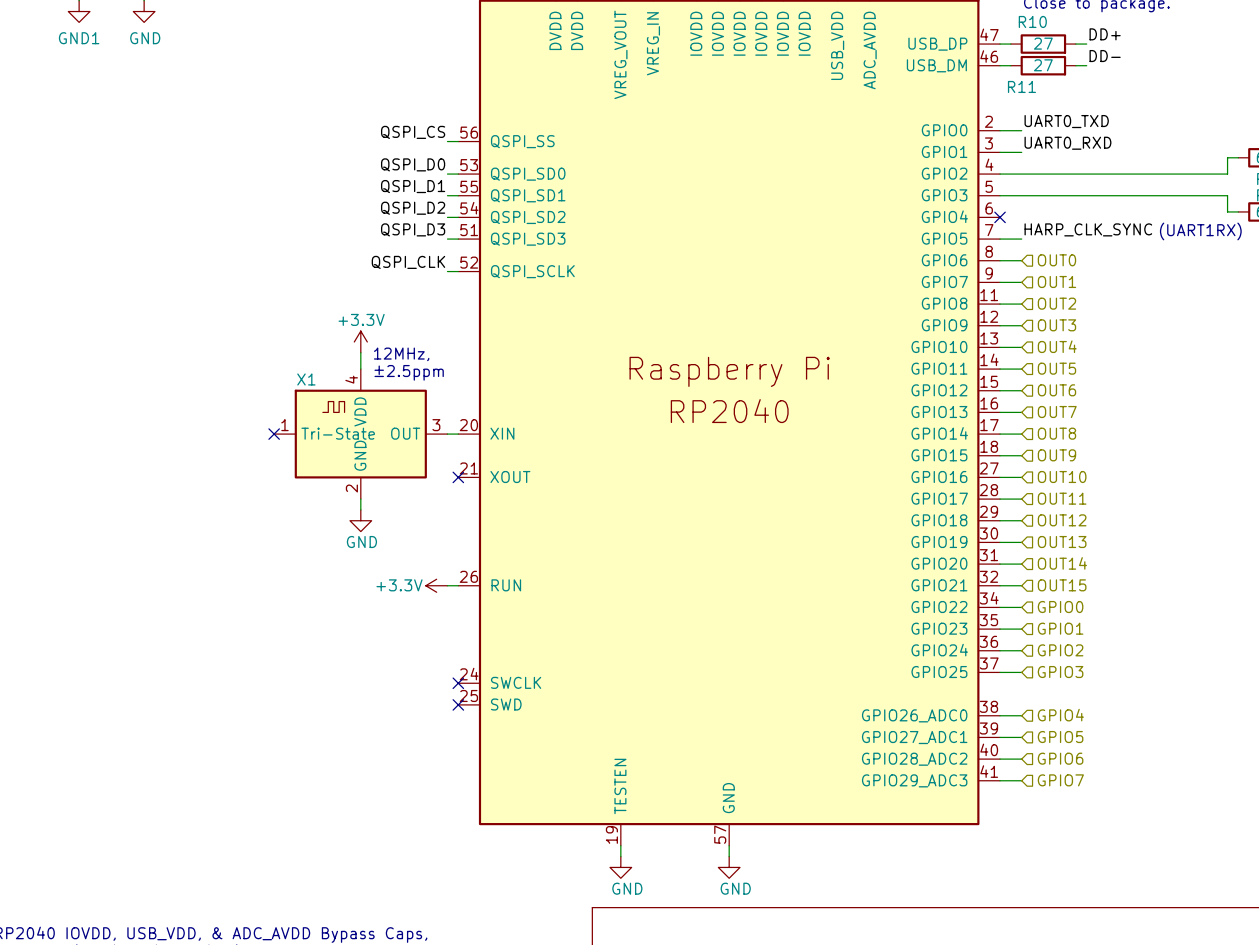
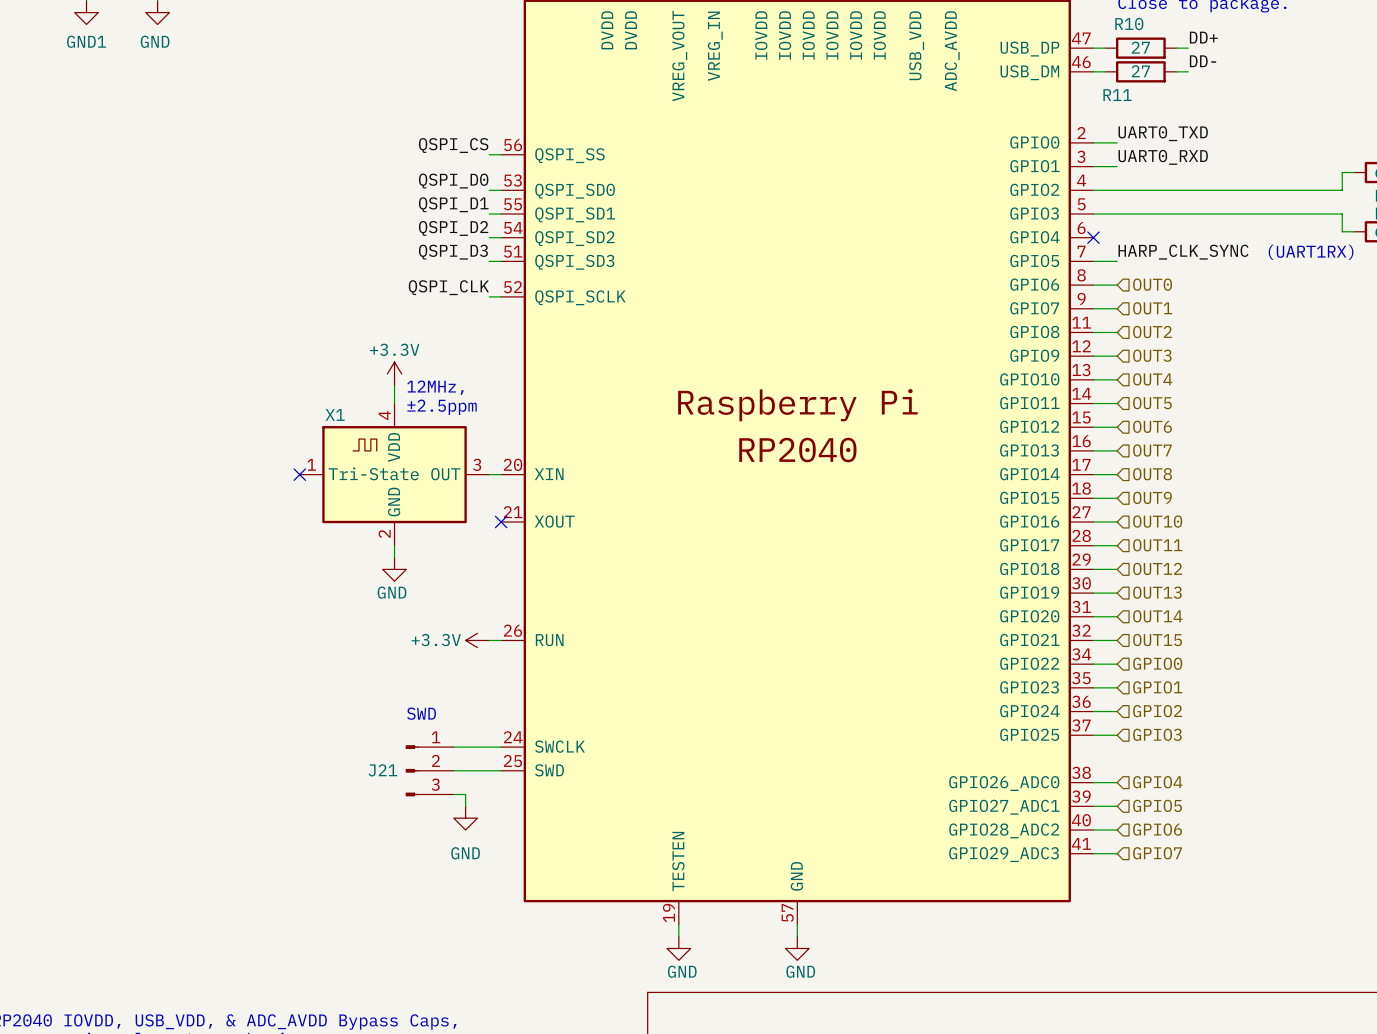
text: none -> SWD (421, 713)
wire: none -> (453, 747) (501, 747)
no-connect mark: (458, 683) -> none
J21: none -> (429, 770)
wire: none -> (453, 770) (501, 770)
no-connect mark: (458, 704) -> none
wire: none -> (453, 794) (465, 794) (465, 806)
power symbol: none -> GND (465, 818)

